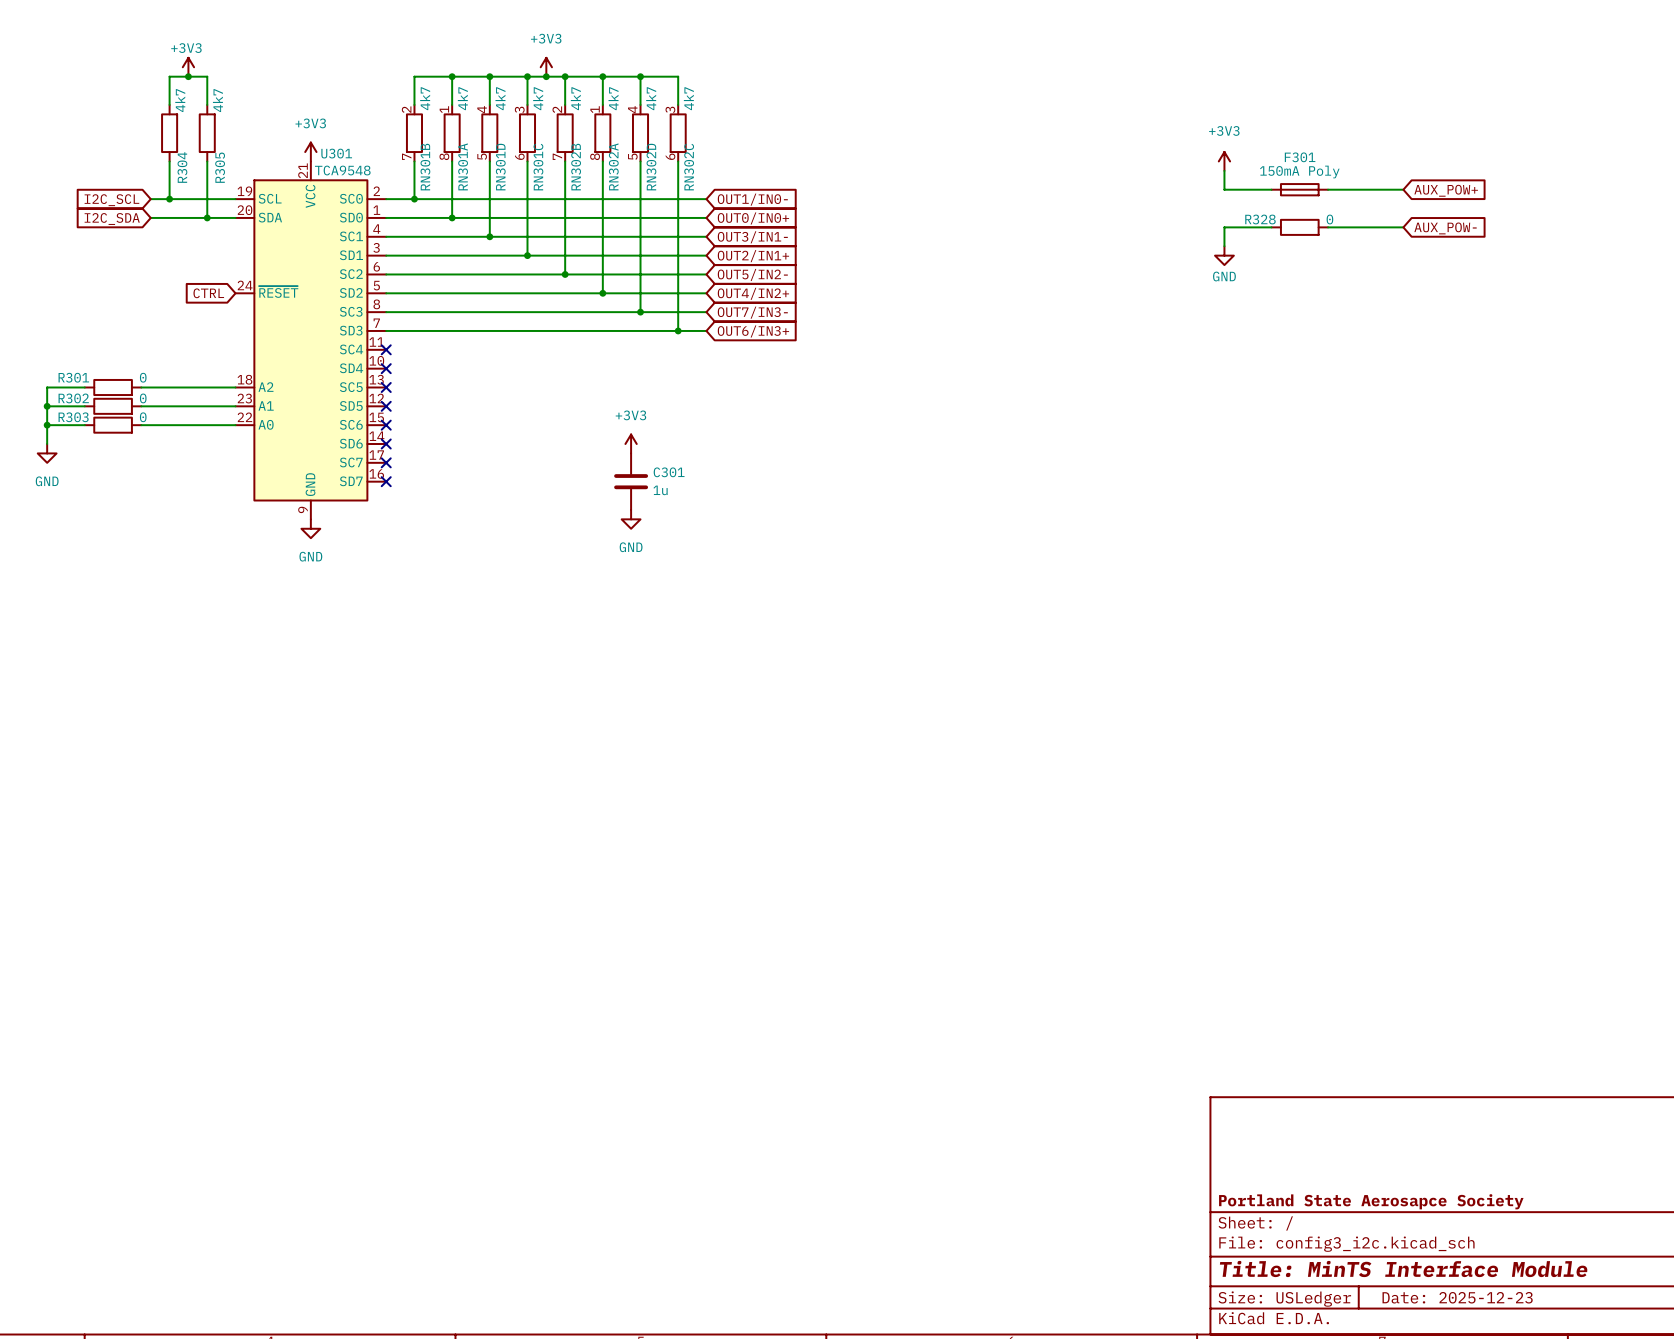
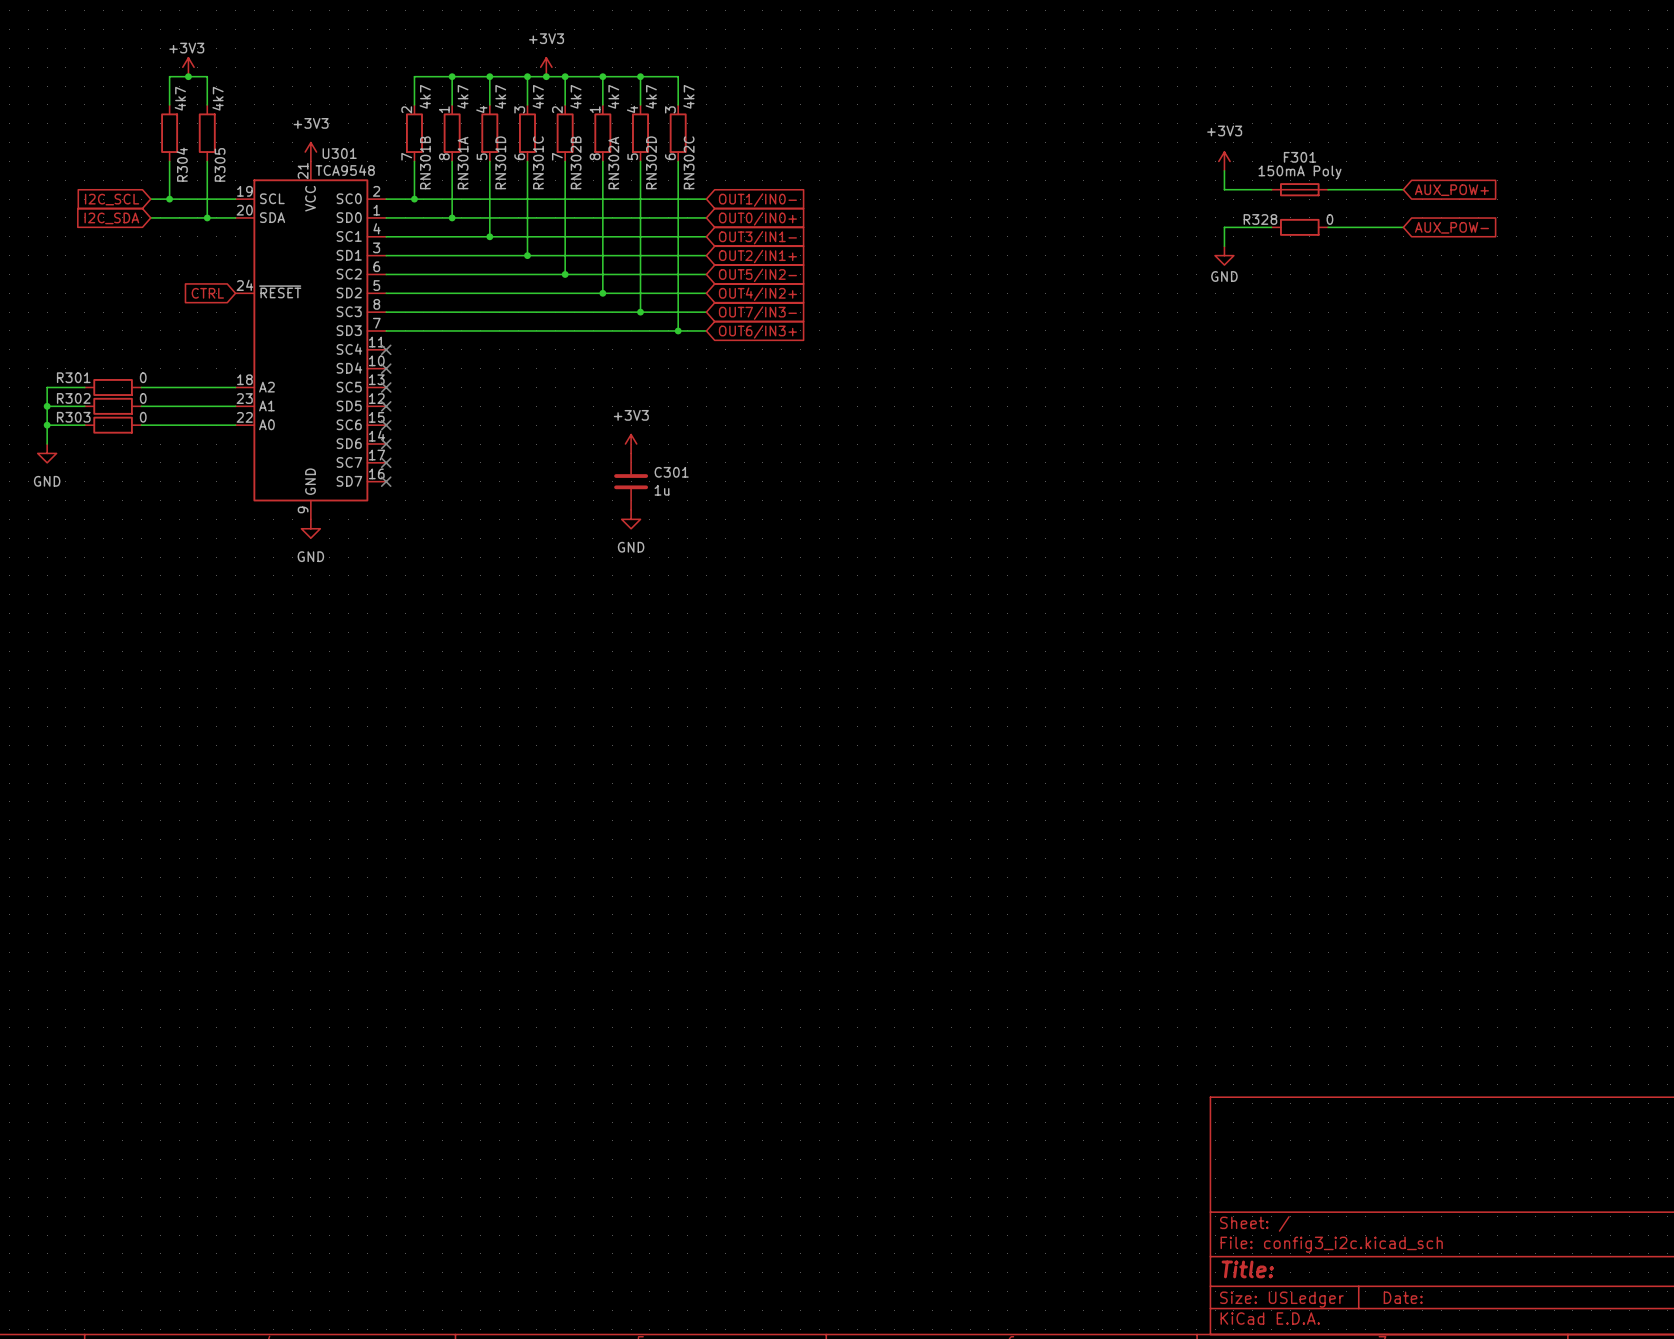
title block: Portland State Aerosapce Society (1371, 1201) -> none
title block: Title: MinTS Interface Module (1403, 1269) -> Title: (1247, 1269)
title block: Date: 2025-12-23 (1457, 1297) -> Date: (1403, 1297)

